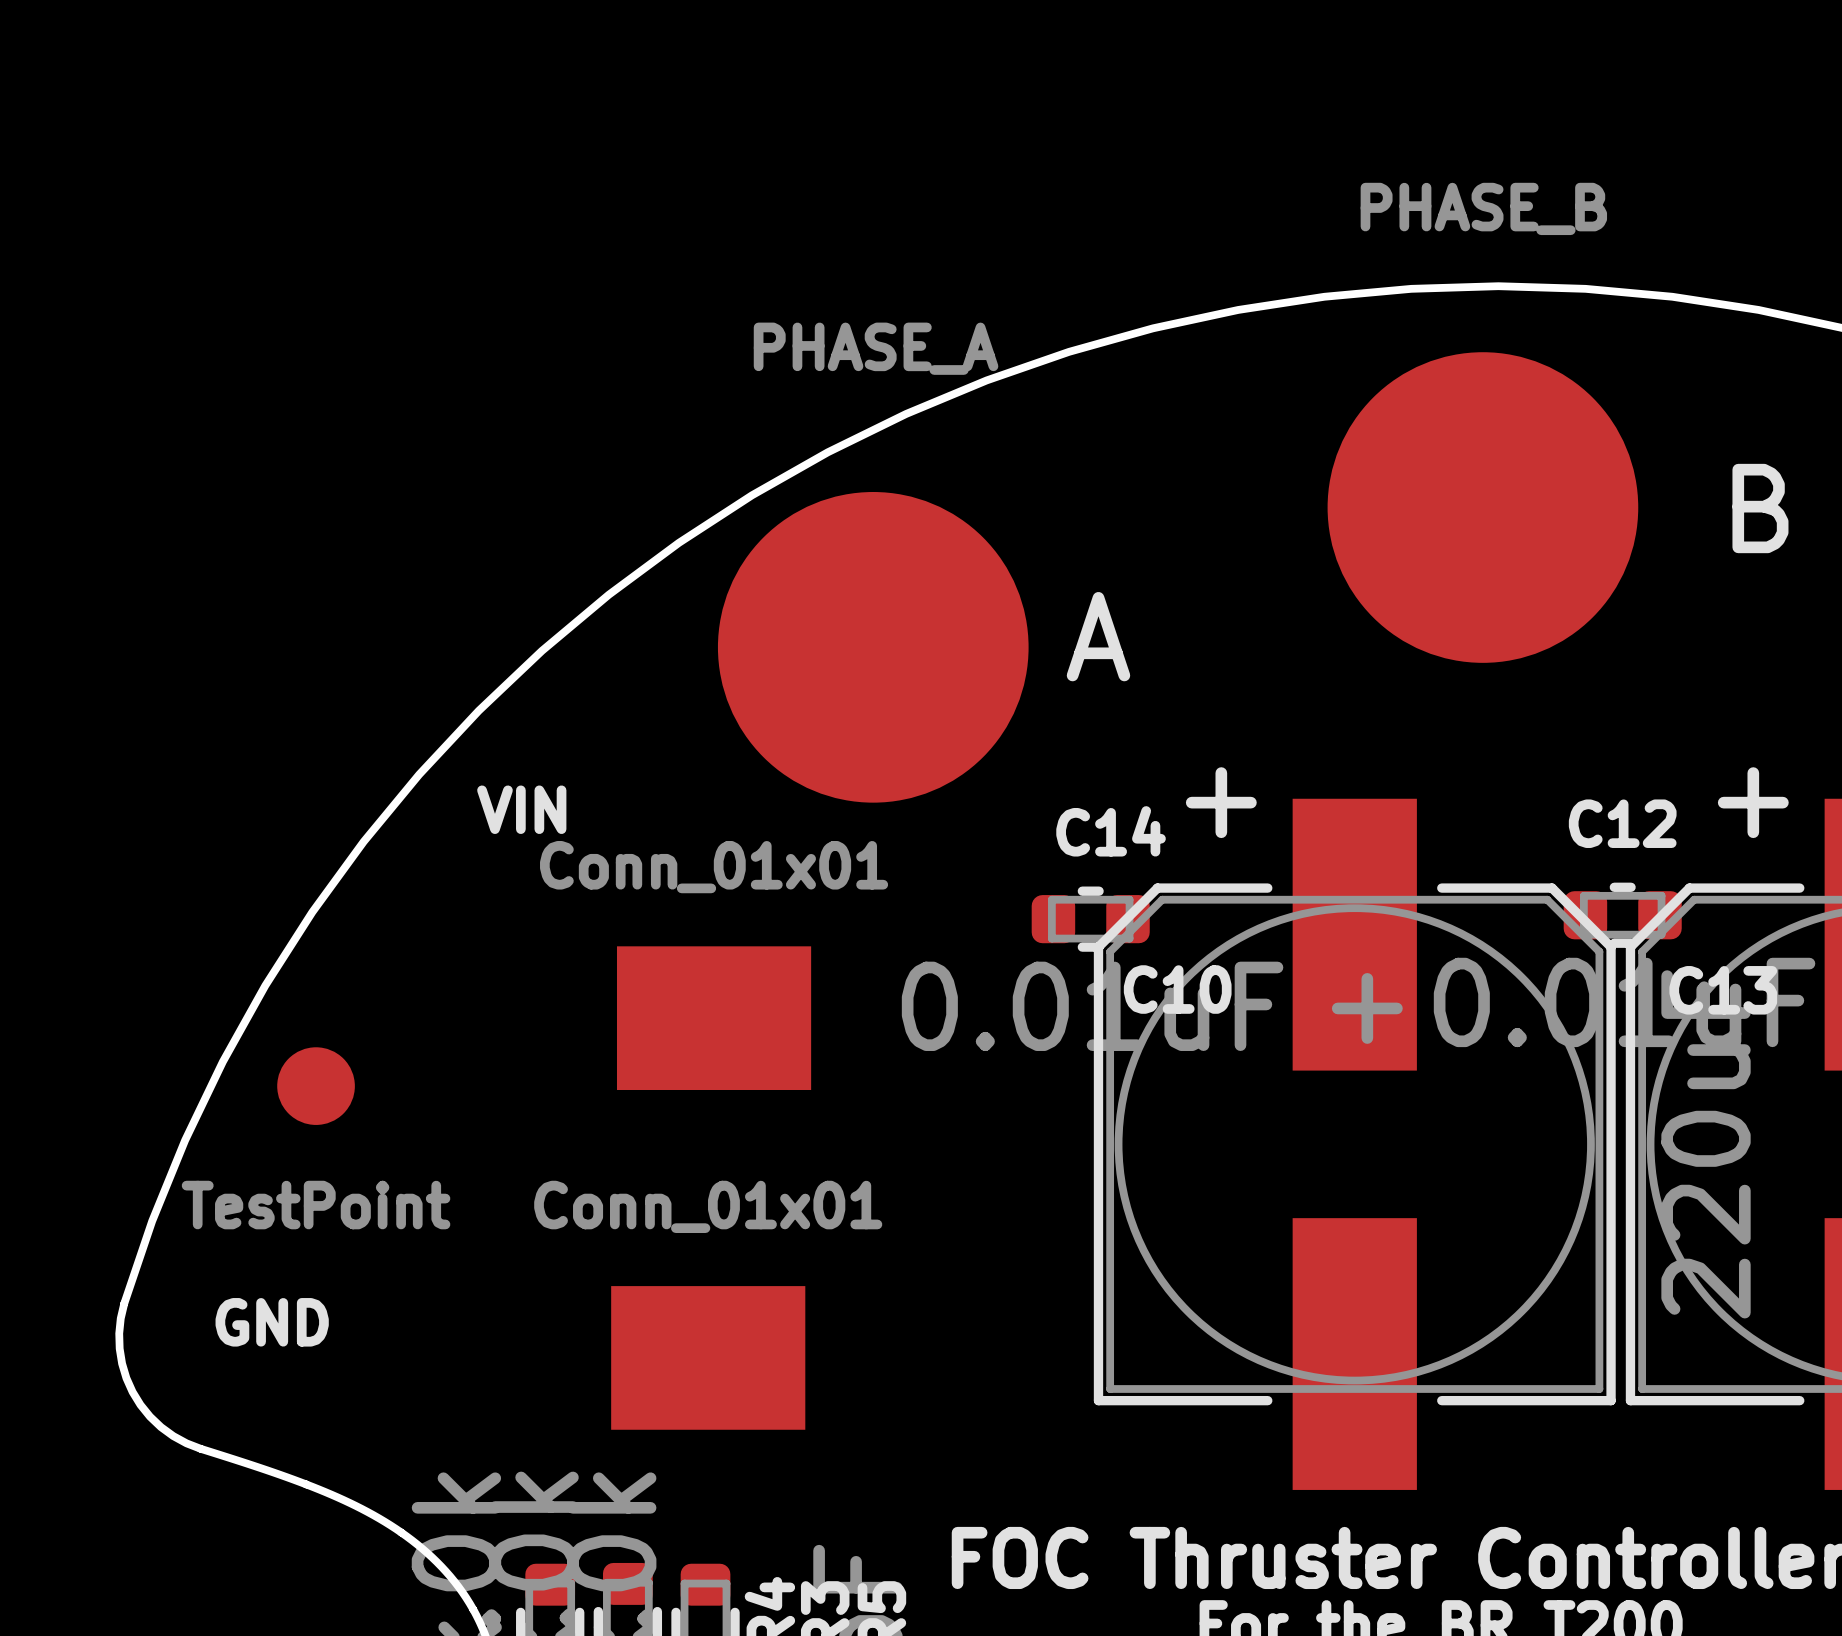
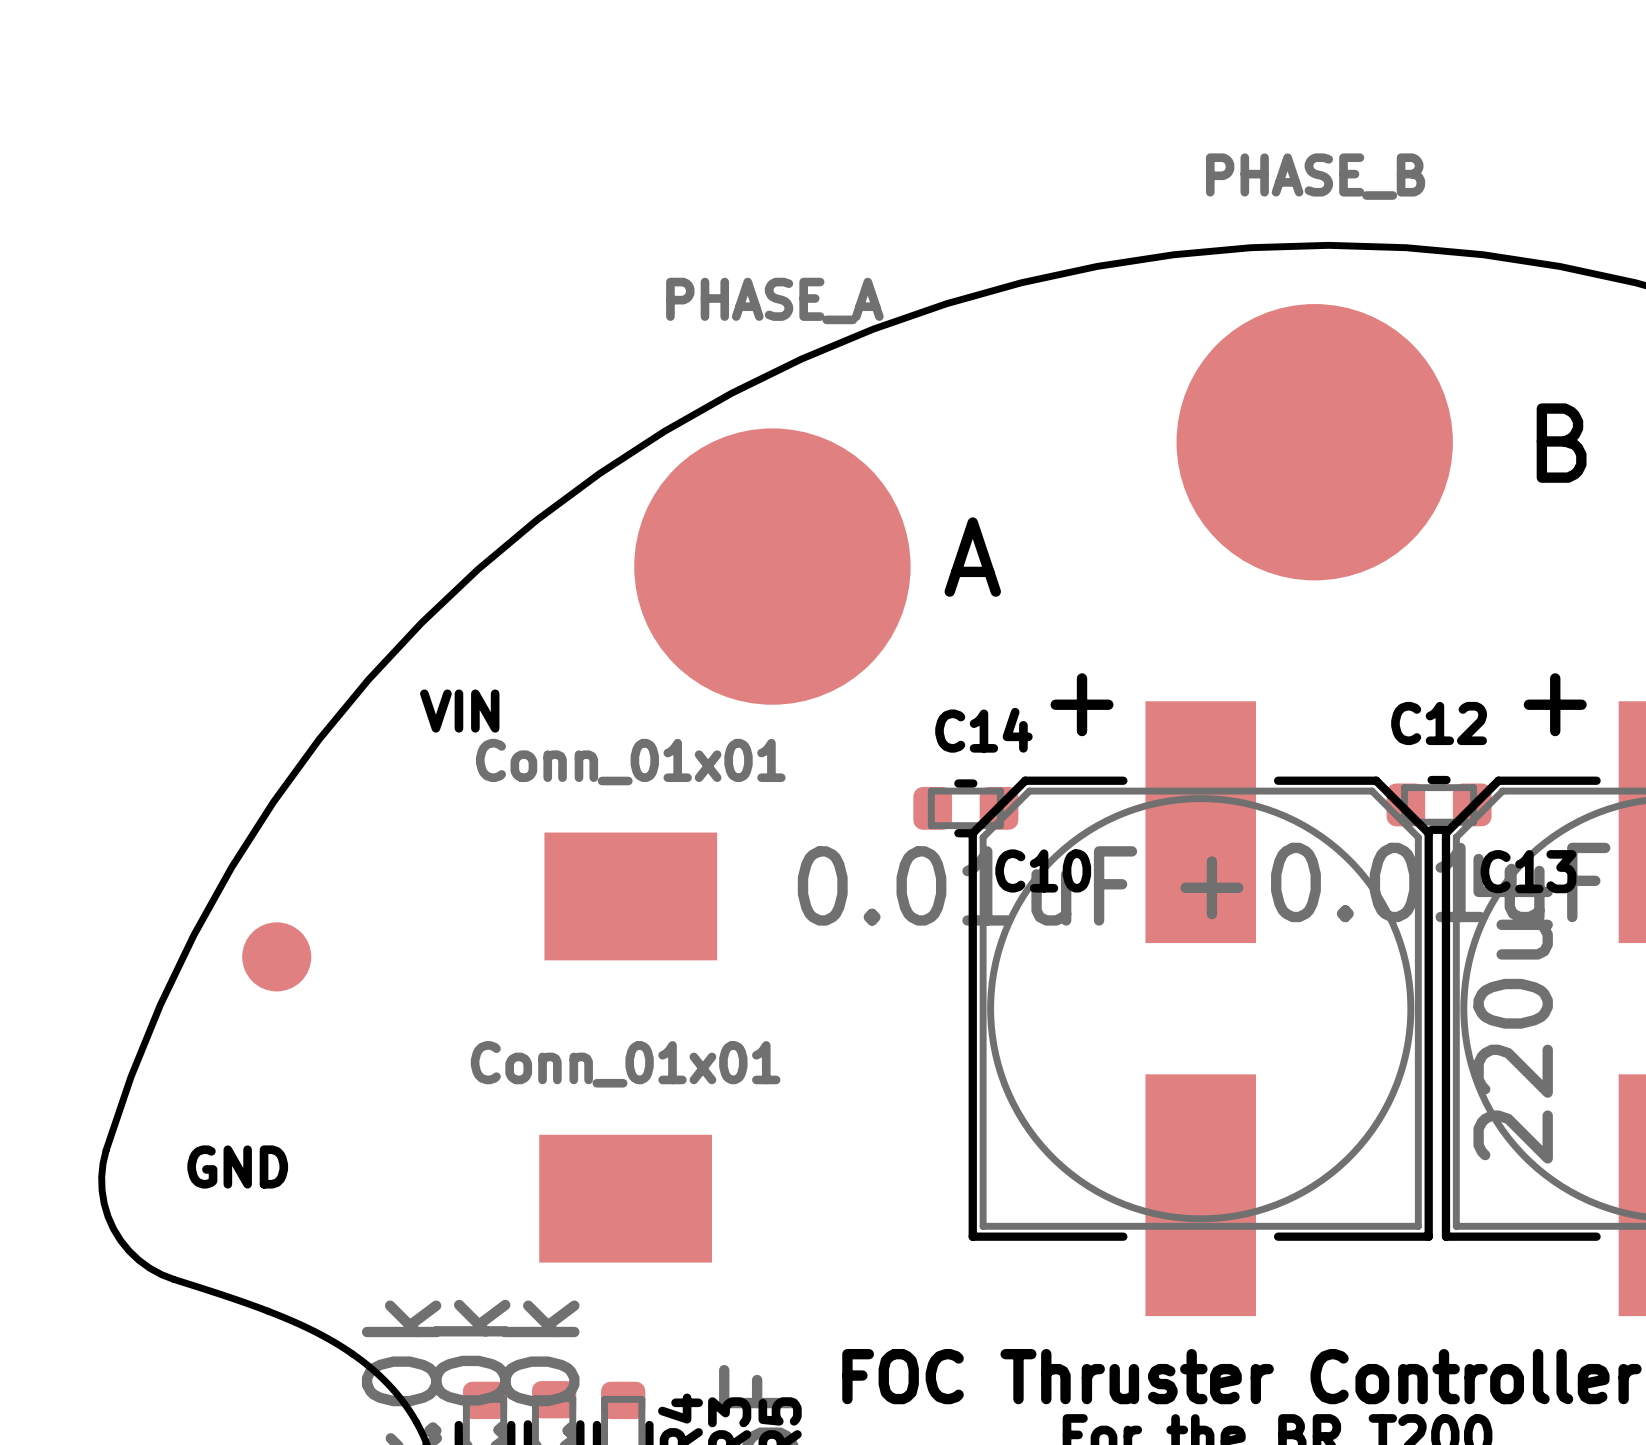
part value: TestPoint (316, 1205) -> none

